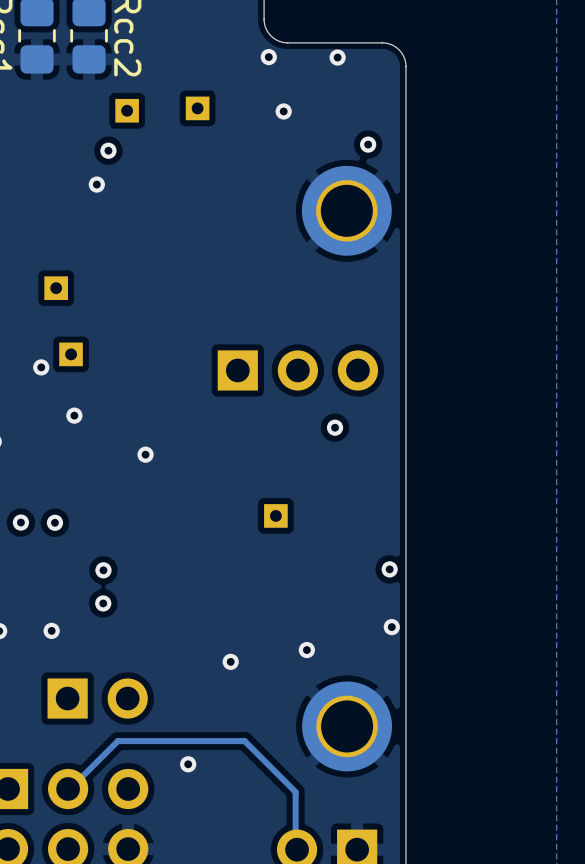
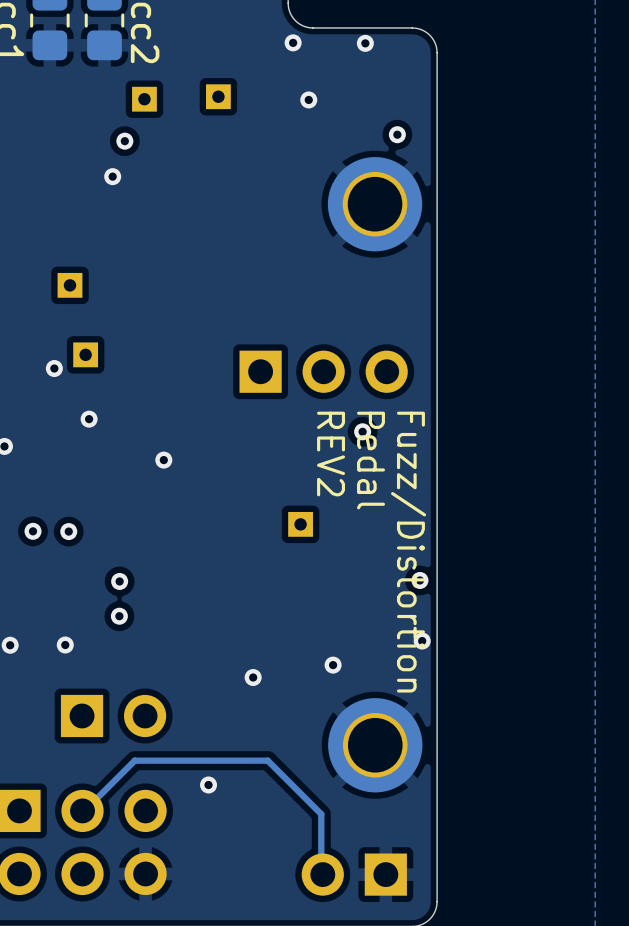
text: none -> REV2 (331, 454)
text: none -> Pedal (371, 460)
text: none -> Fuzz/Distortion (408, 552)

